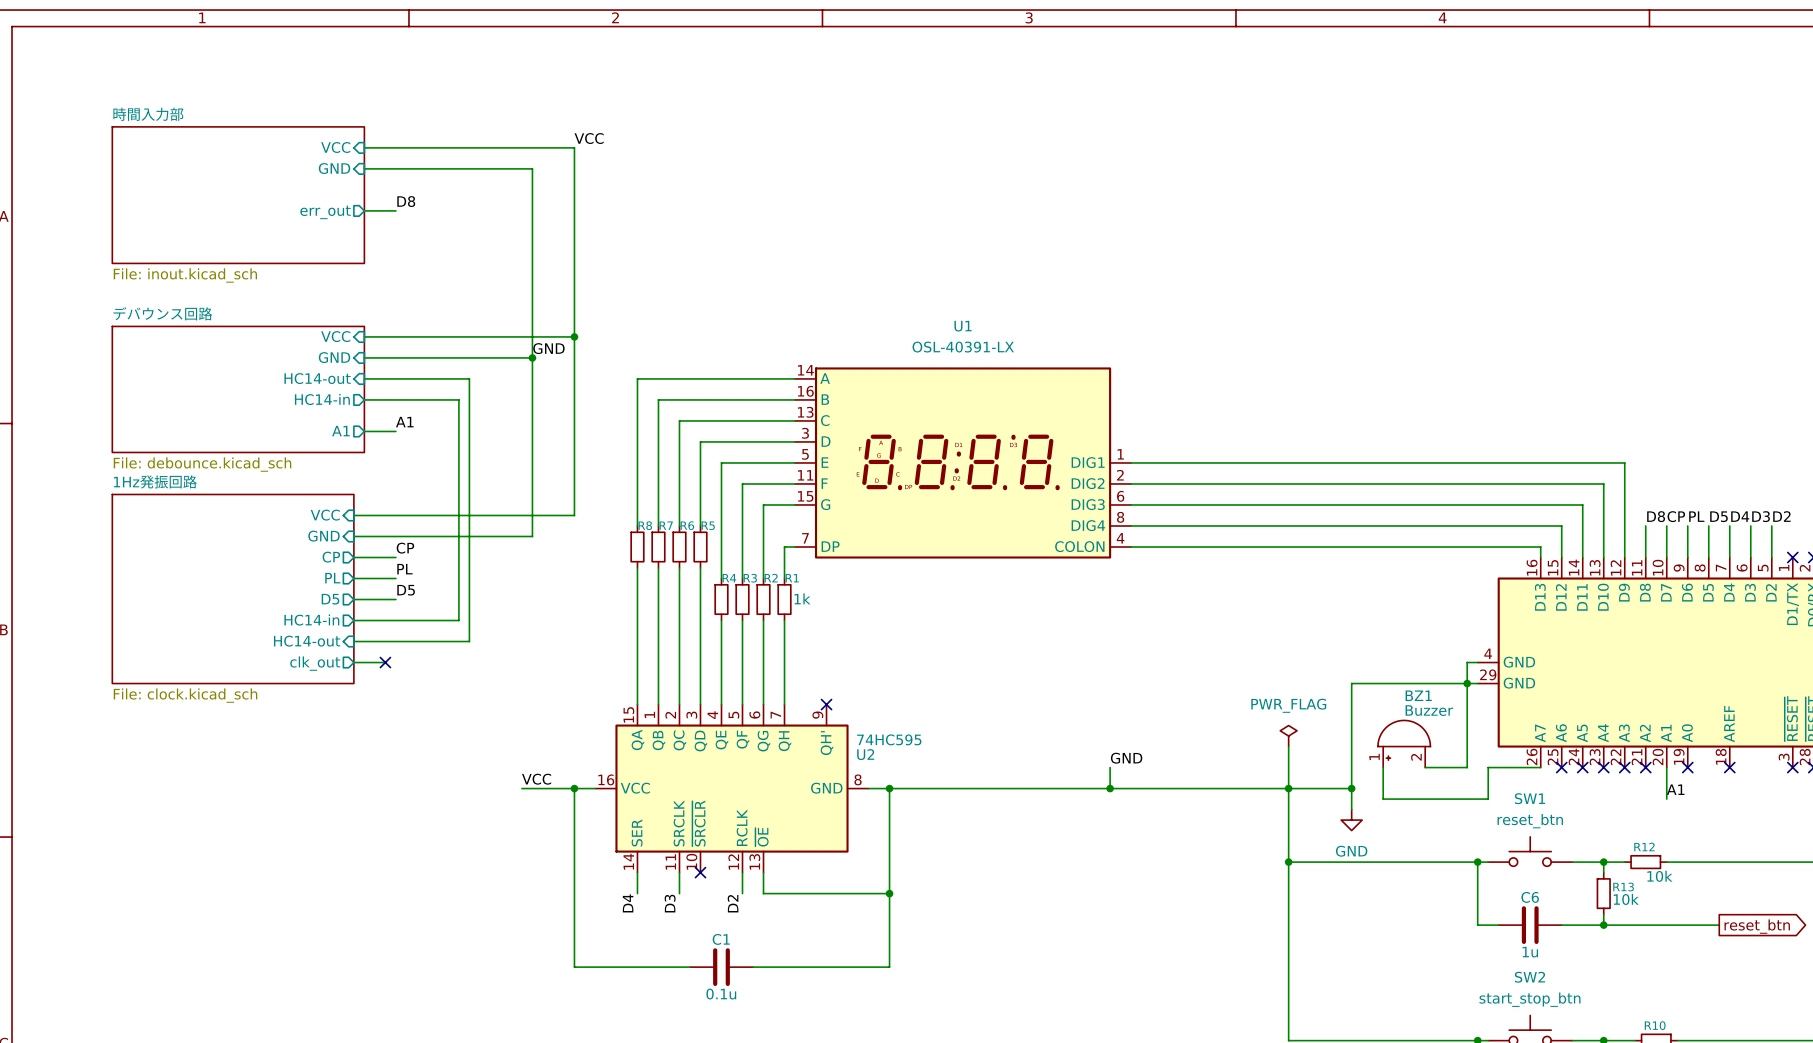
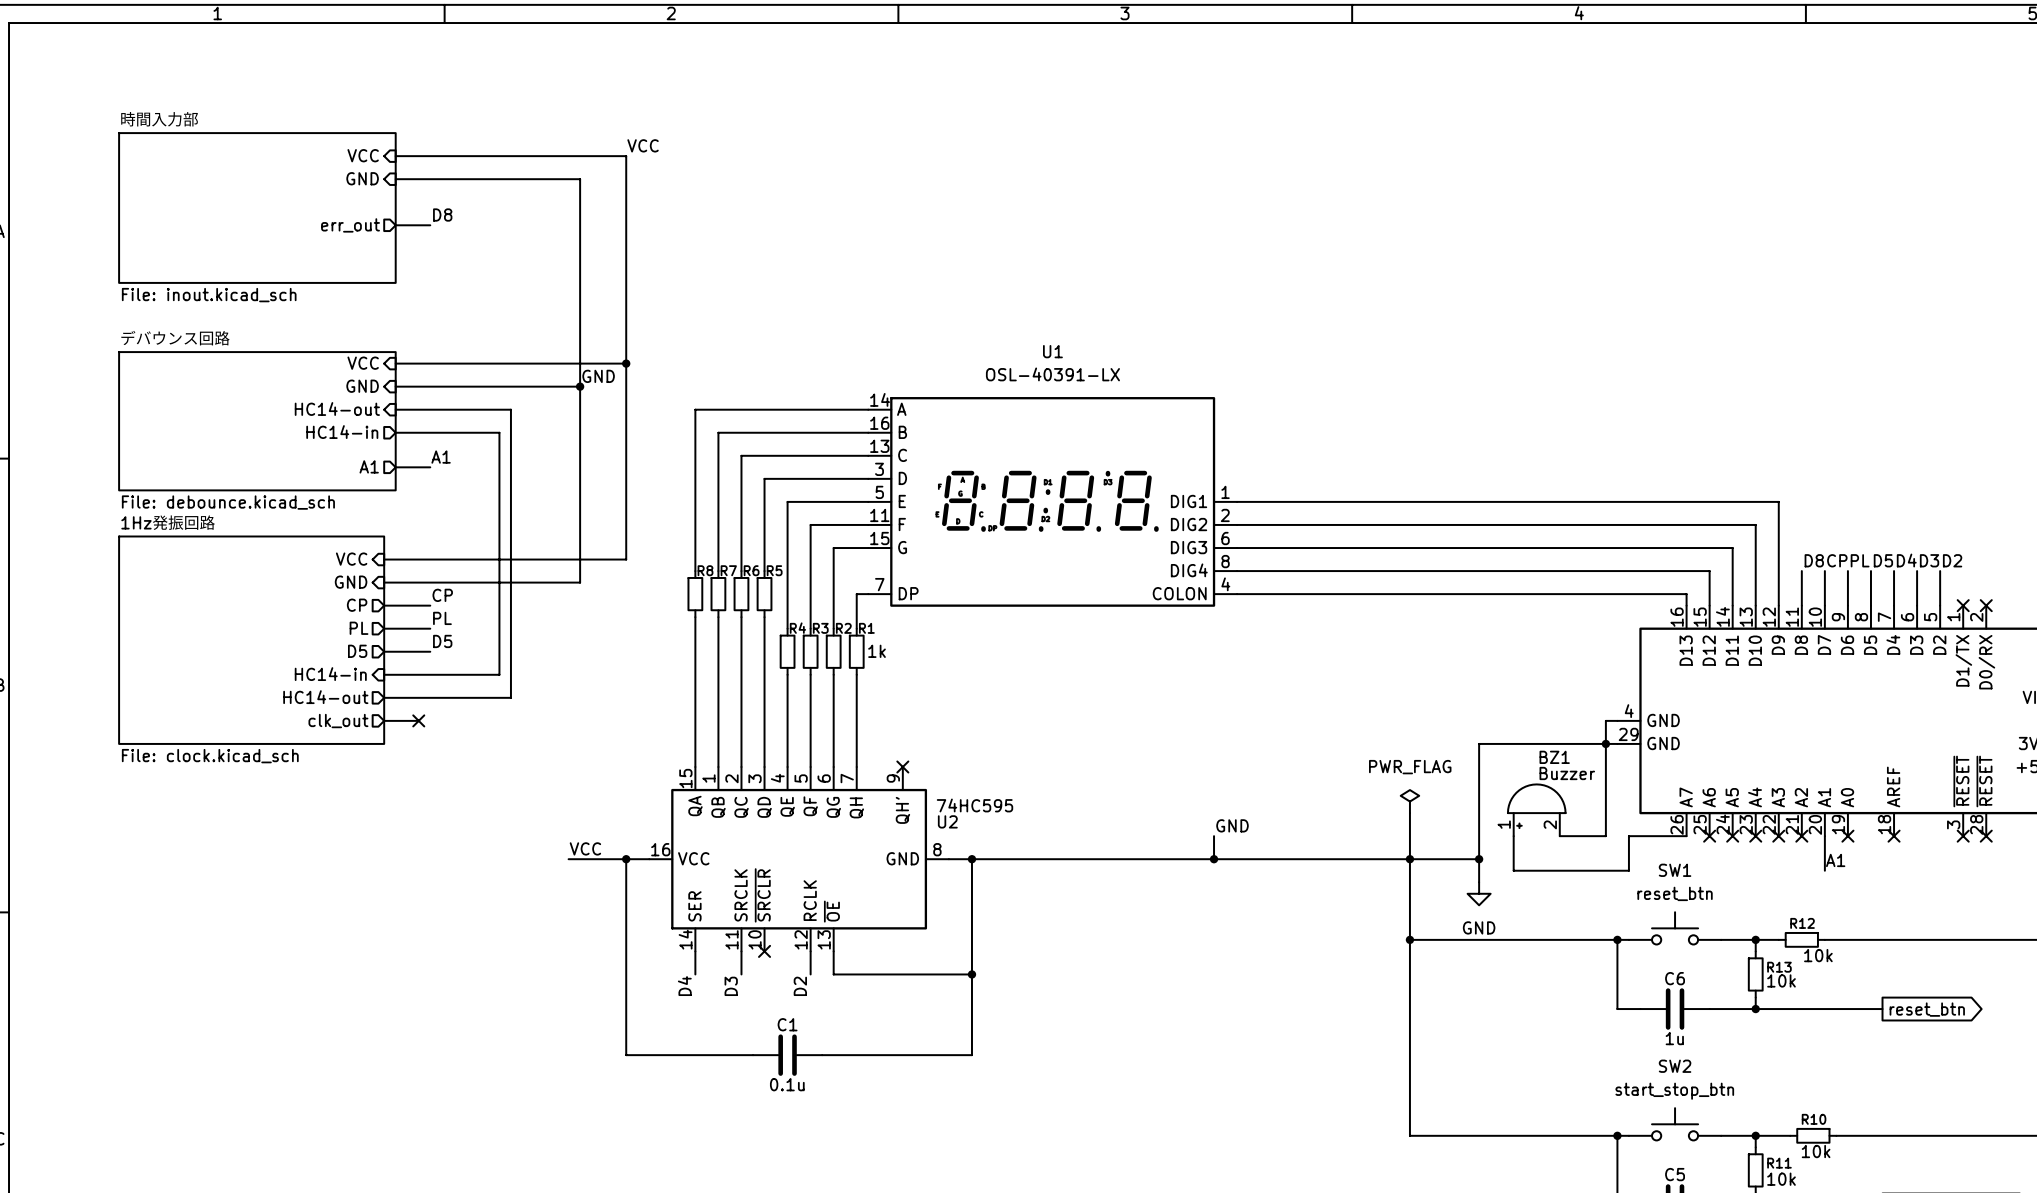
sheet pin shape: output (311, 620) -> input (330, 674)
sheet pin shape: input (307, 641) -> output (325, 697)

